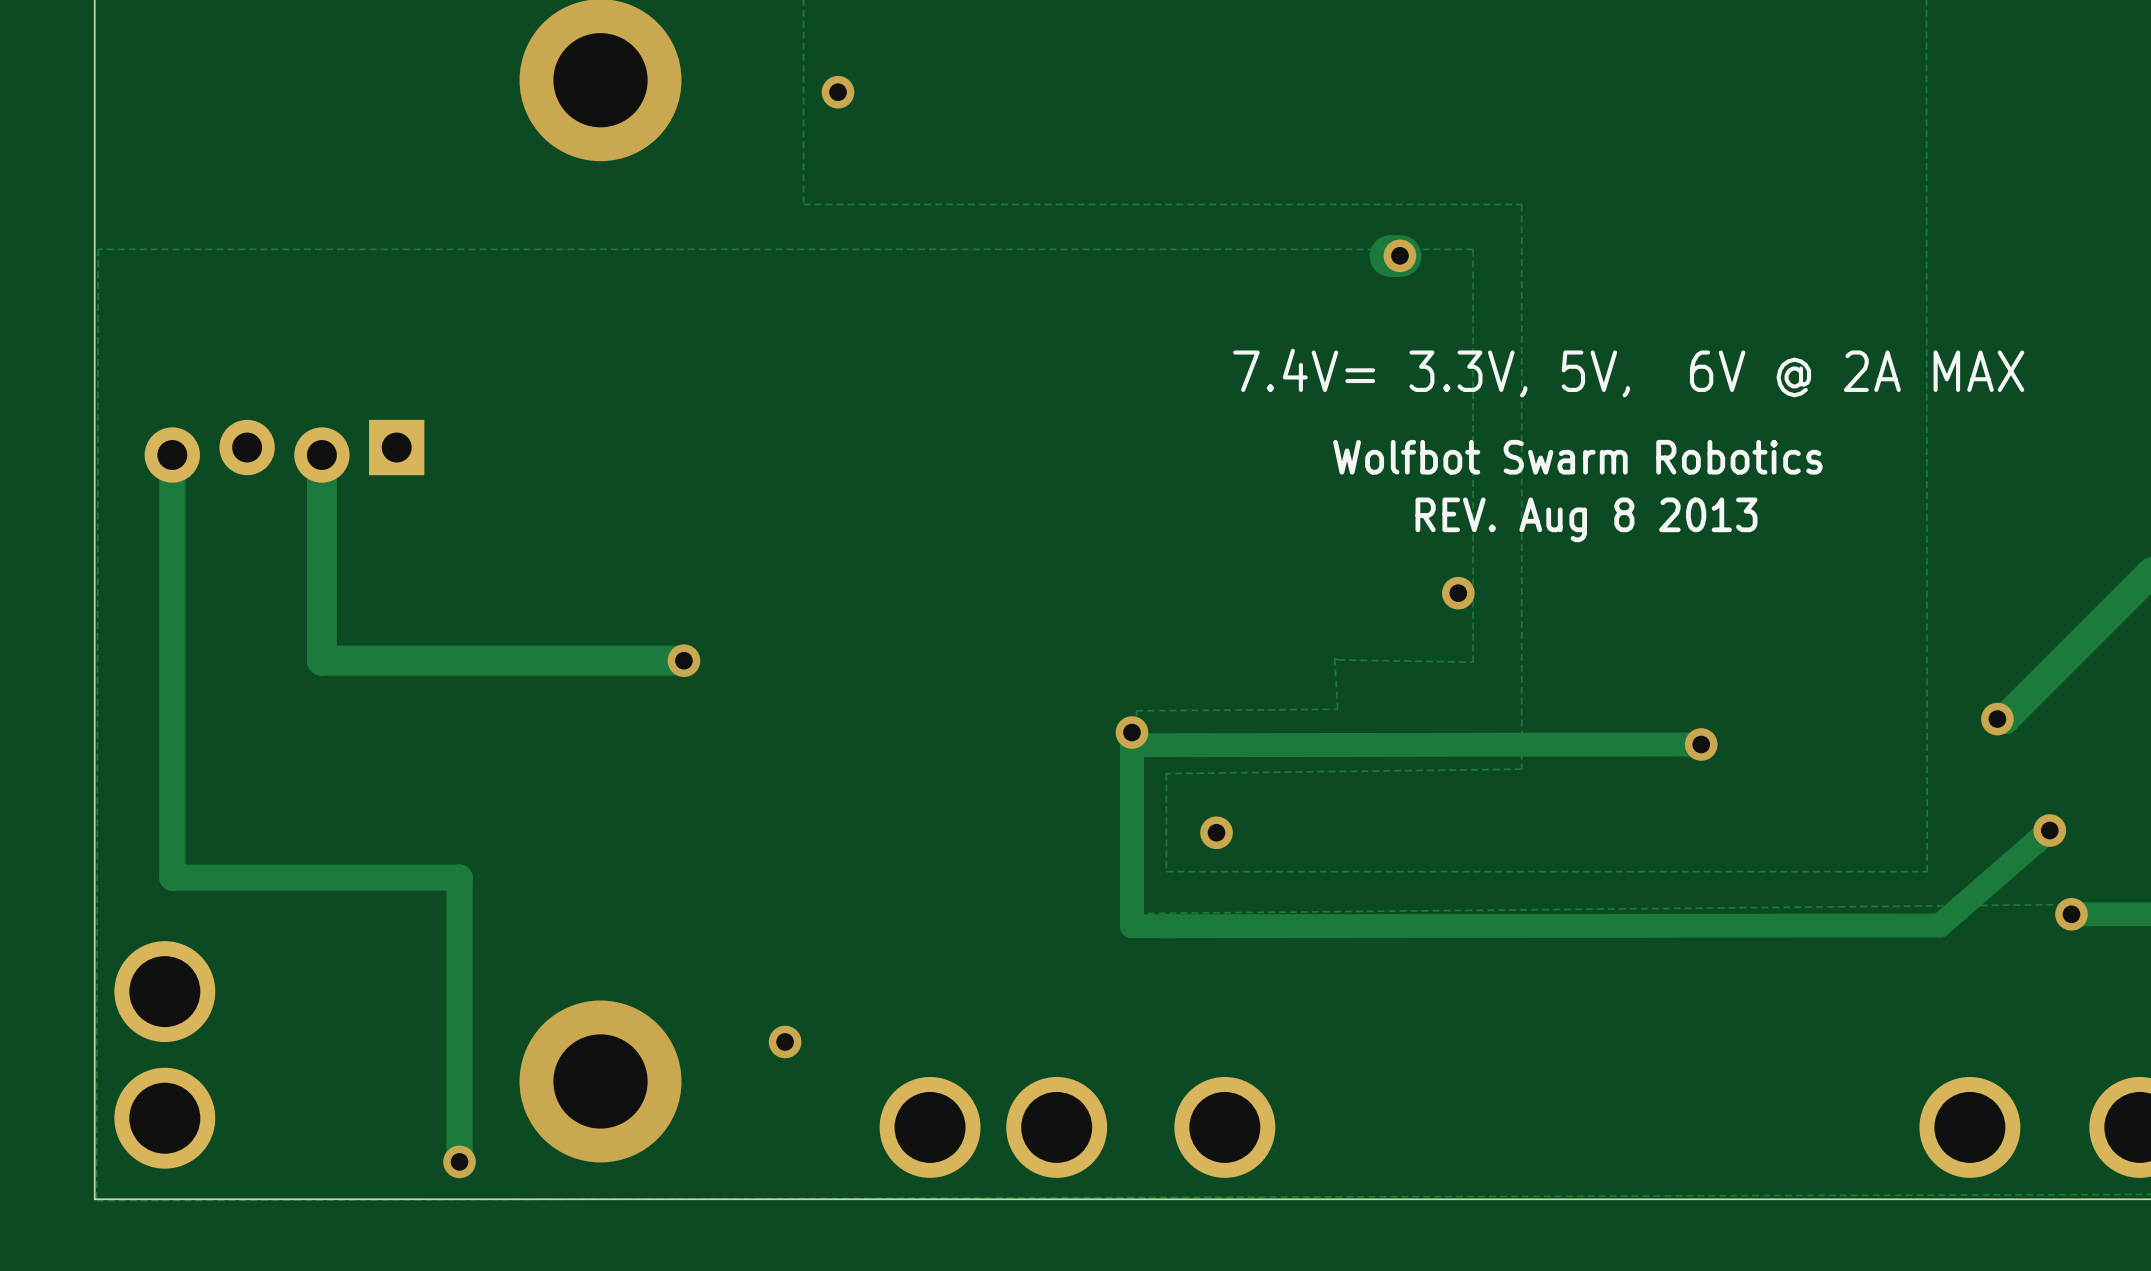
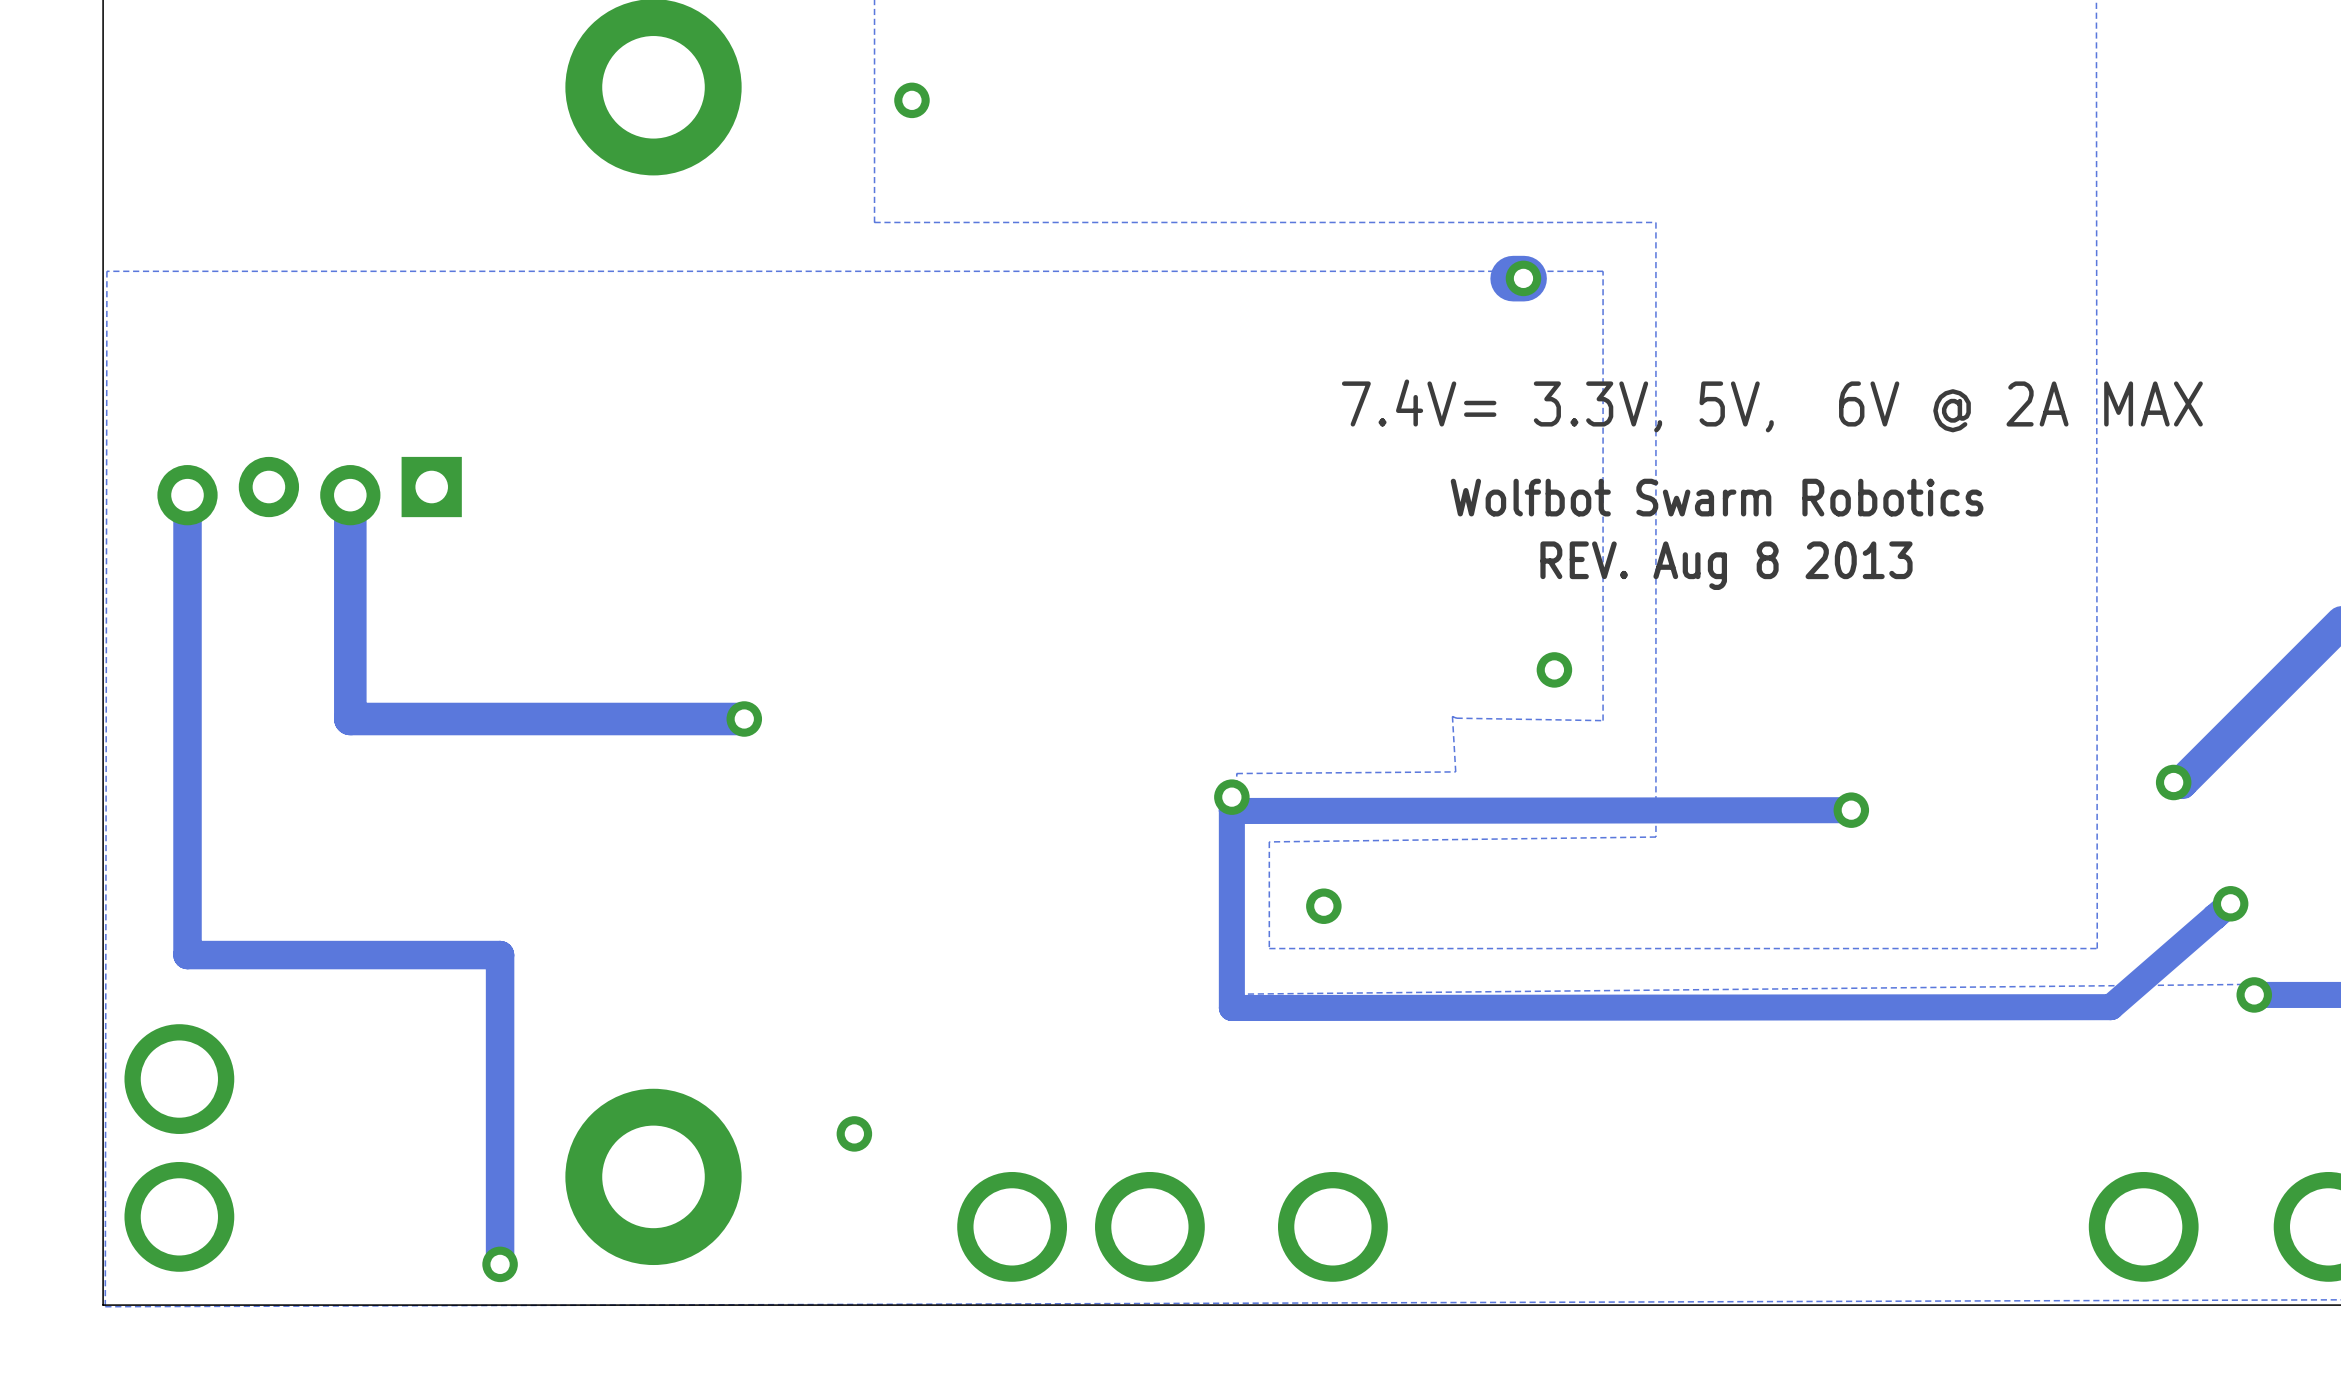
via position: (1458, 593) -> (1554, 669)

